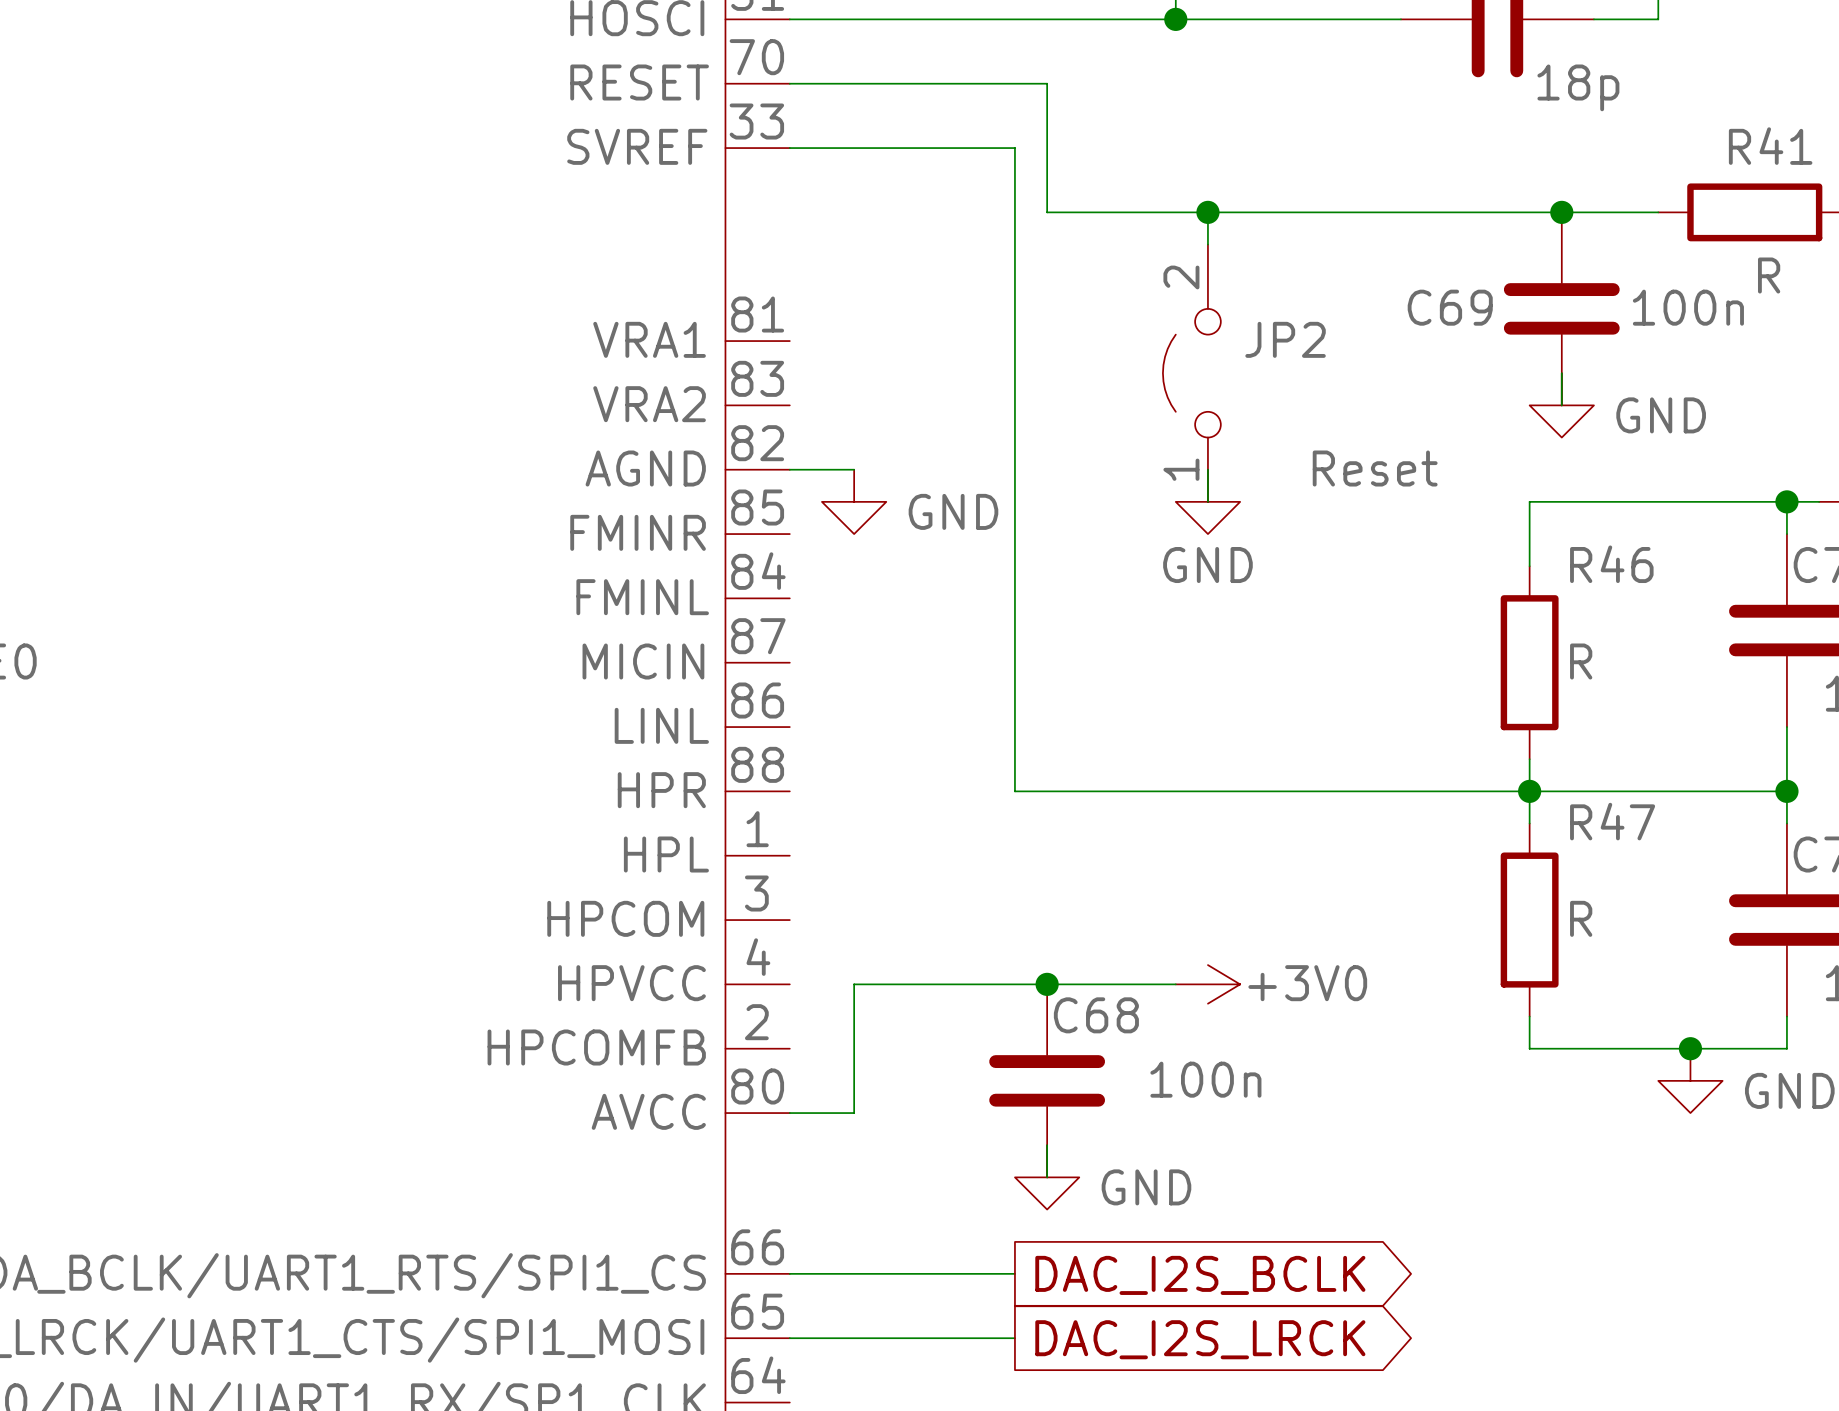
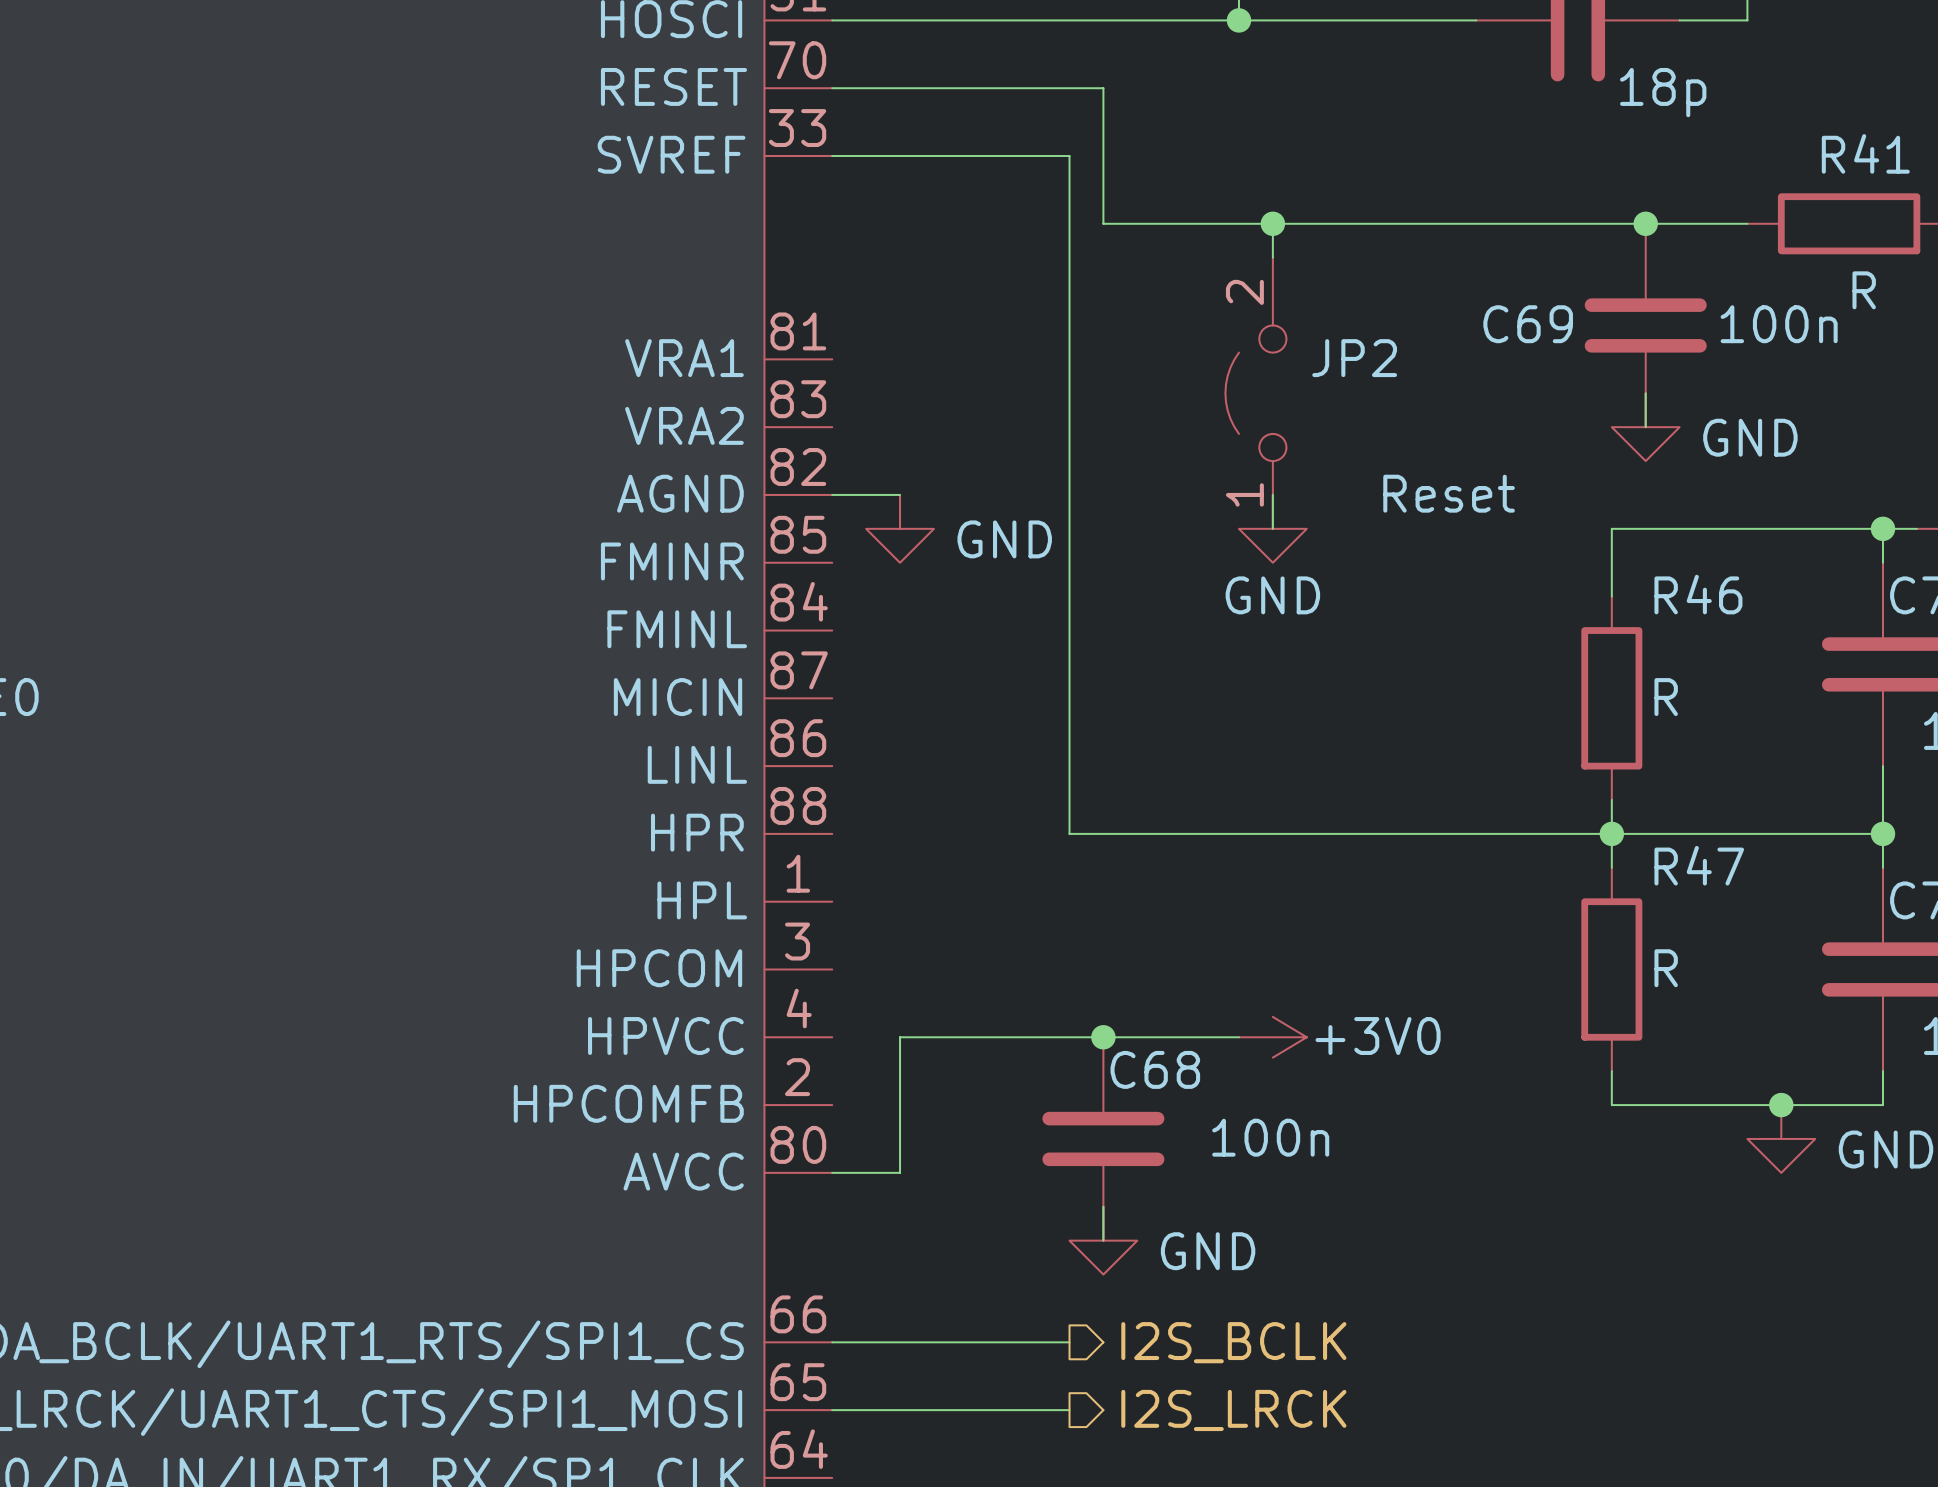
hierarchical label: none -> I2S_BCLK (1233, 1342)
global label: DAC_I2S_BCLK (1200, 1275) -> none
hierarchical label: none -> I2S_LRCK (1233, 1410)
global label: DAC_I2S_LRCK (1200, 1339) -> none

